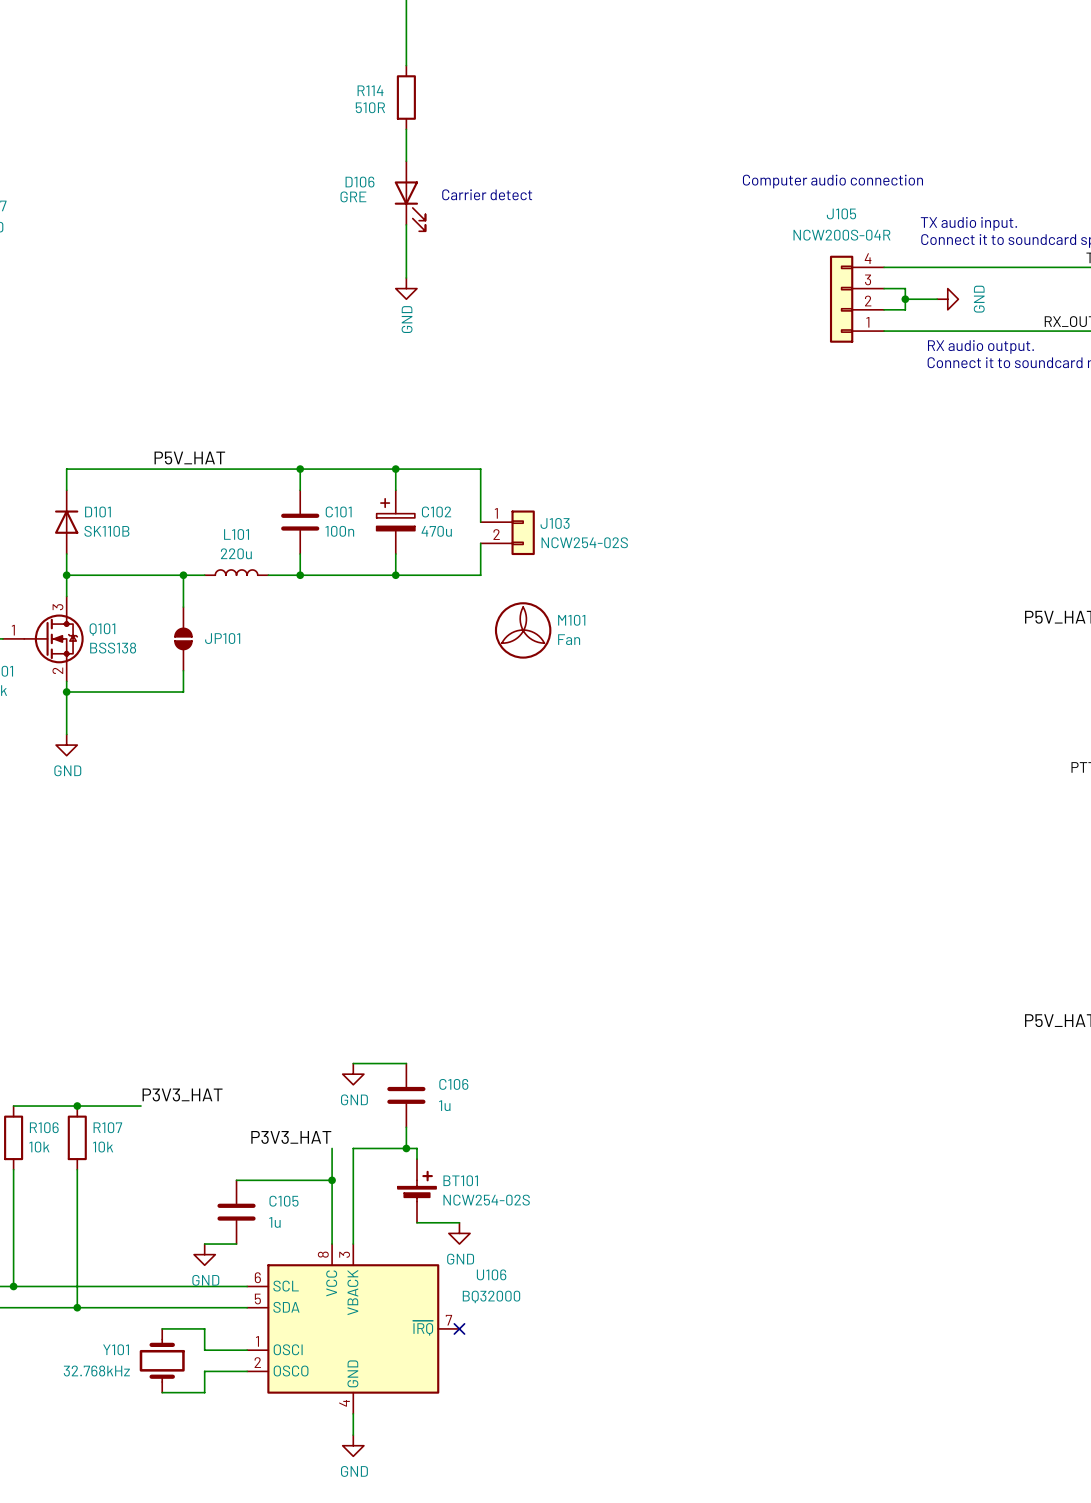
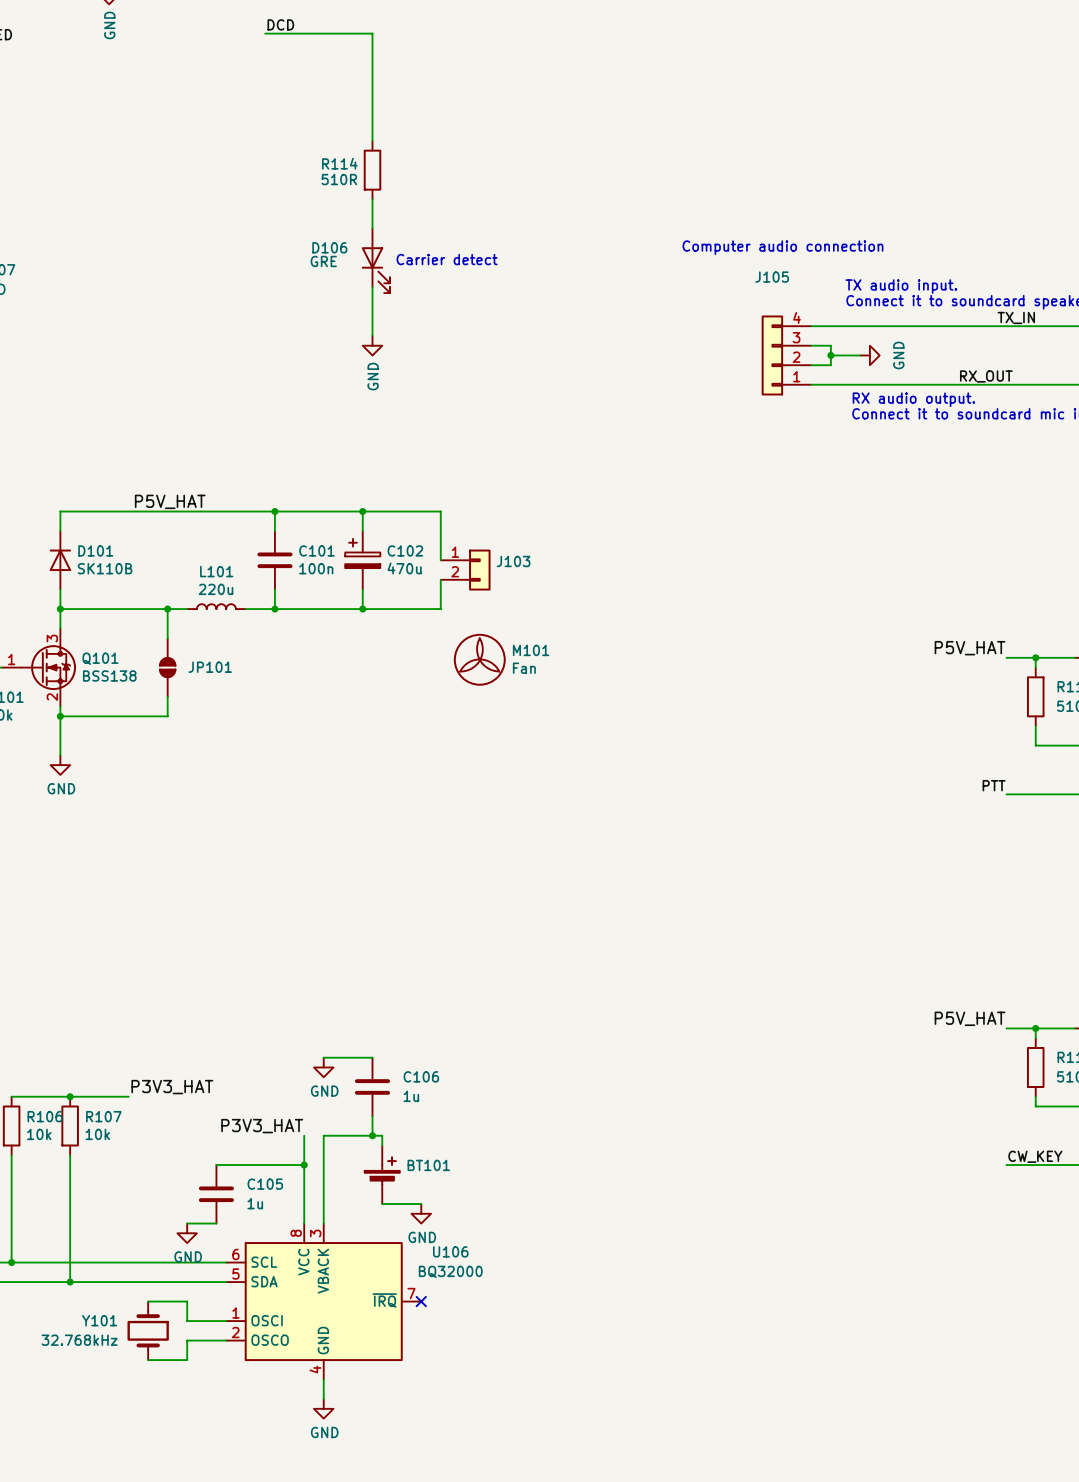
J105 value: NCW200S-04R (841, 235) -> none
J103 value: NCW254-02S (584, 542) -> none
BT101 value: NCW254-02S (486, 1200) -> none

